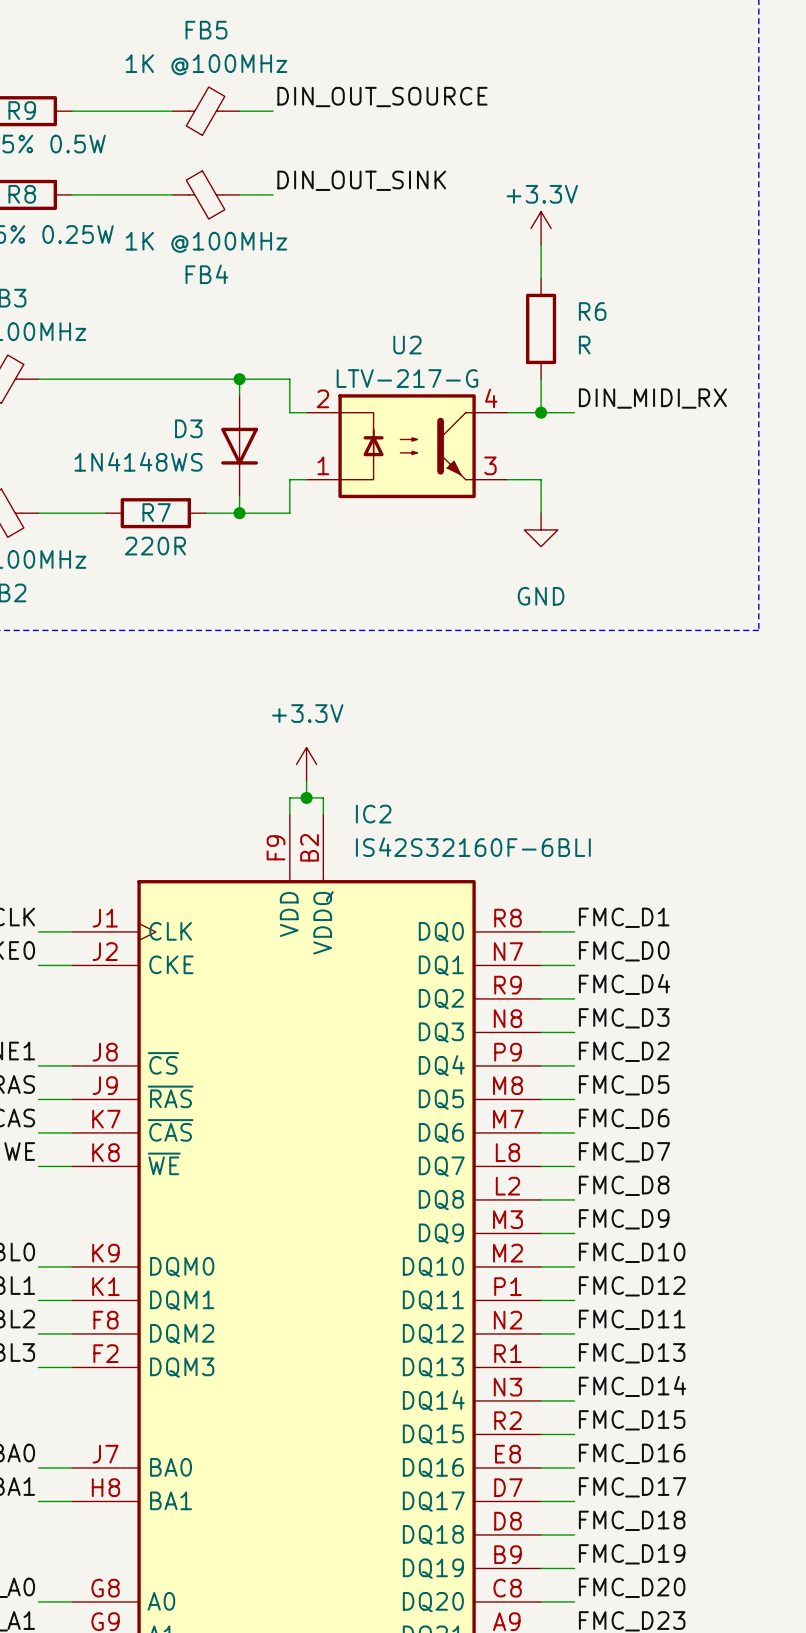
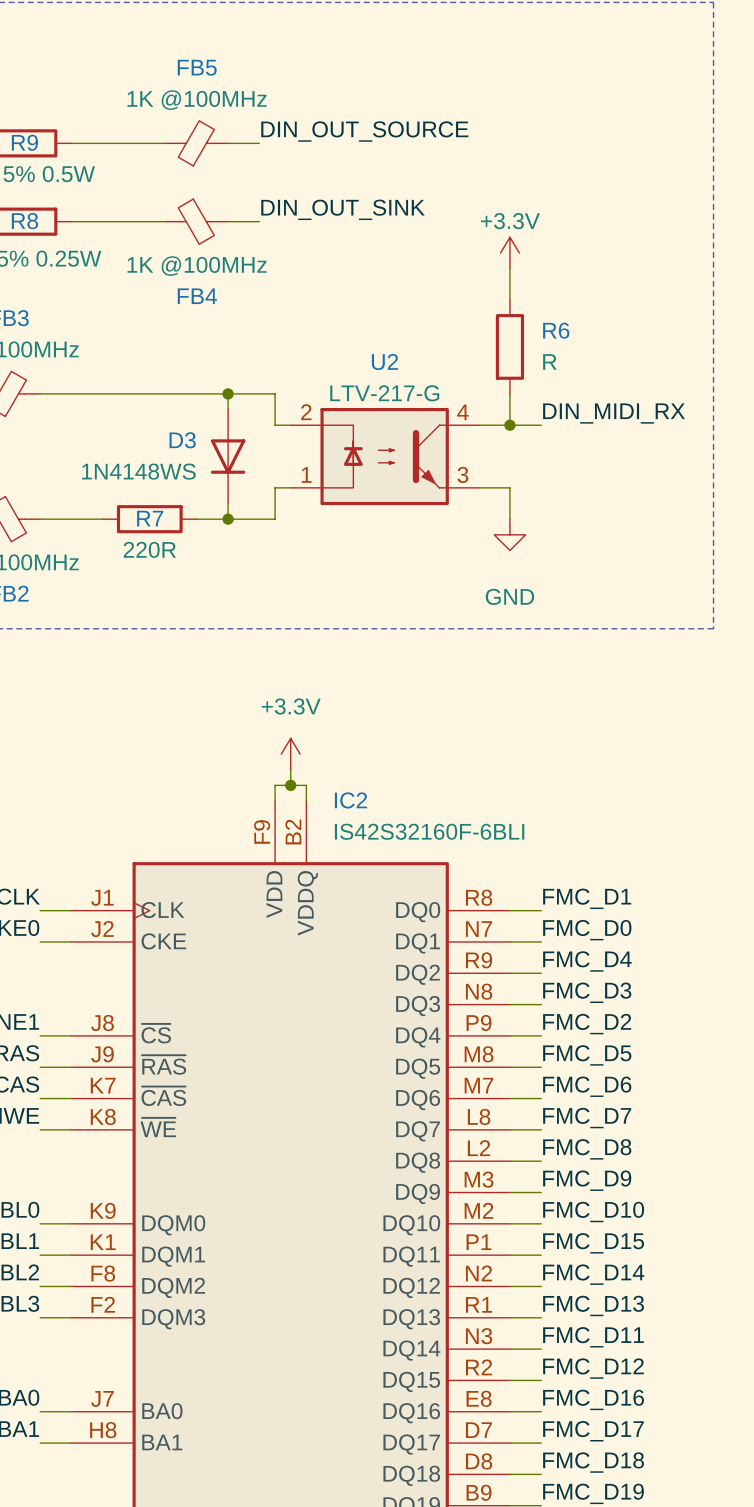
label: FMC_D12 (632, 1286) -> FMC_D15 (593, 1243)
label: FMC_D11 (632, 1319) -> FMC_D14 (593, 1274)
label: FMC_D14 (632, 1386) -> FMC_D11 (593, 1337)
label: FMC_D15 (632, 1420) -> FMC_D12 (593, 1368)

